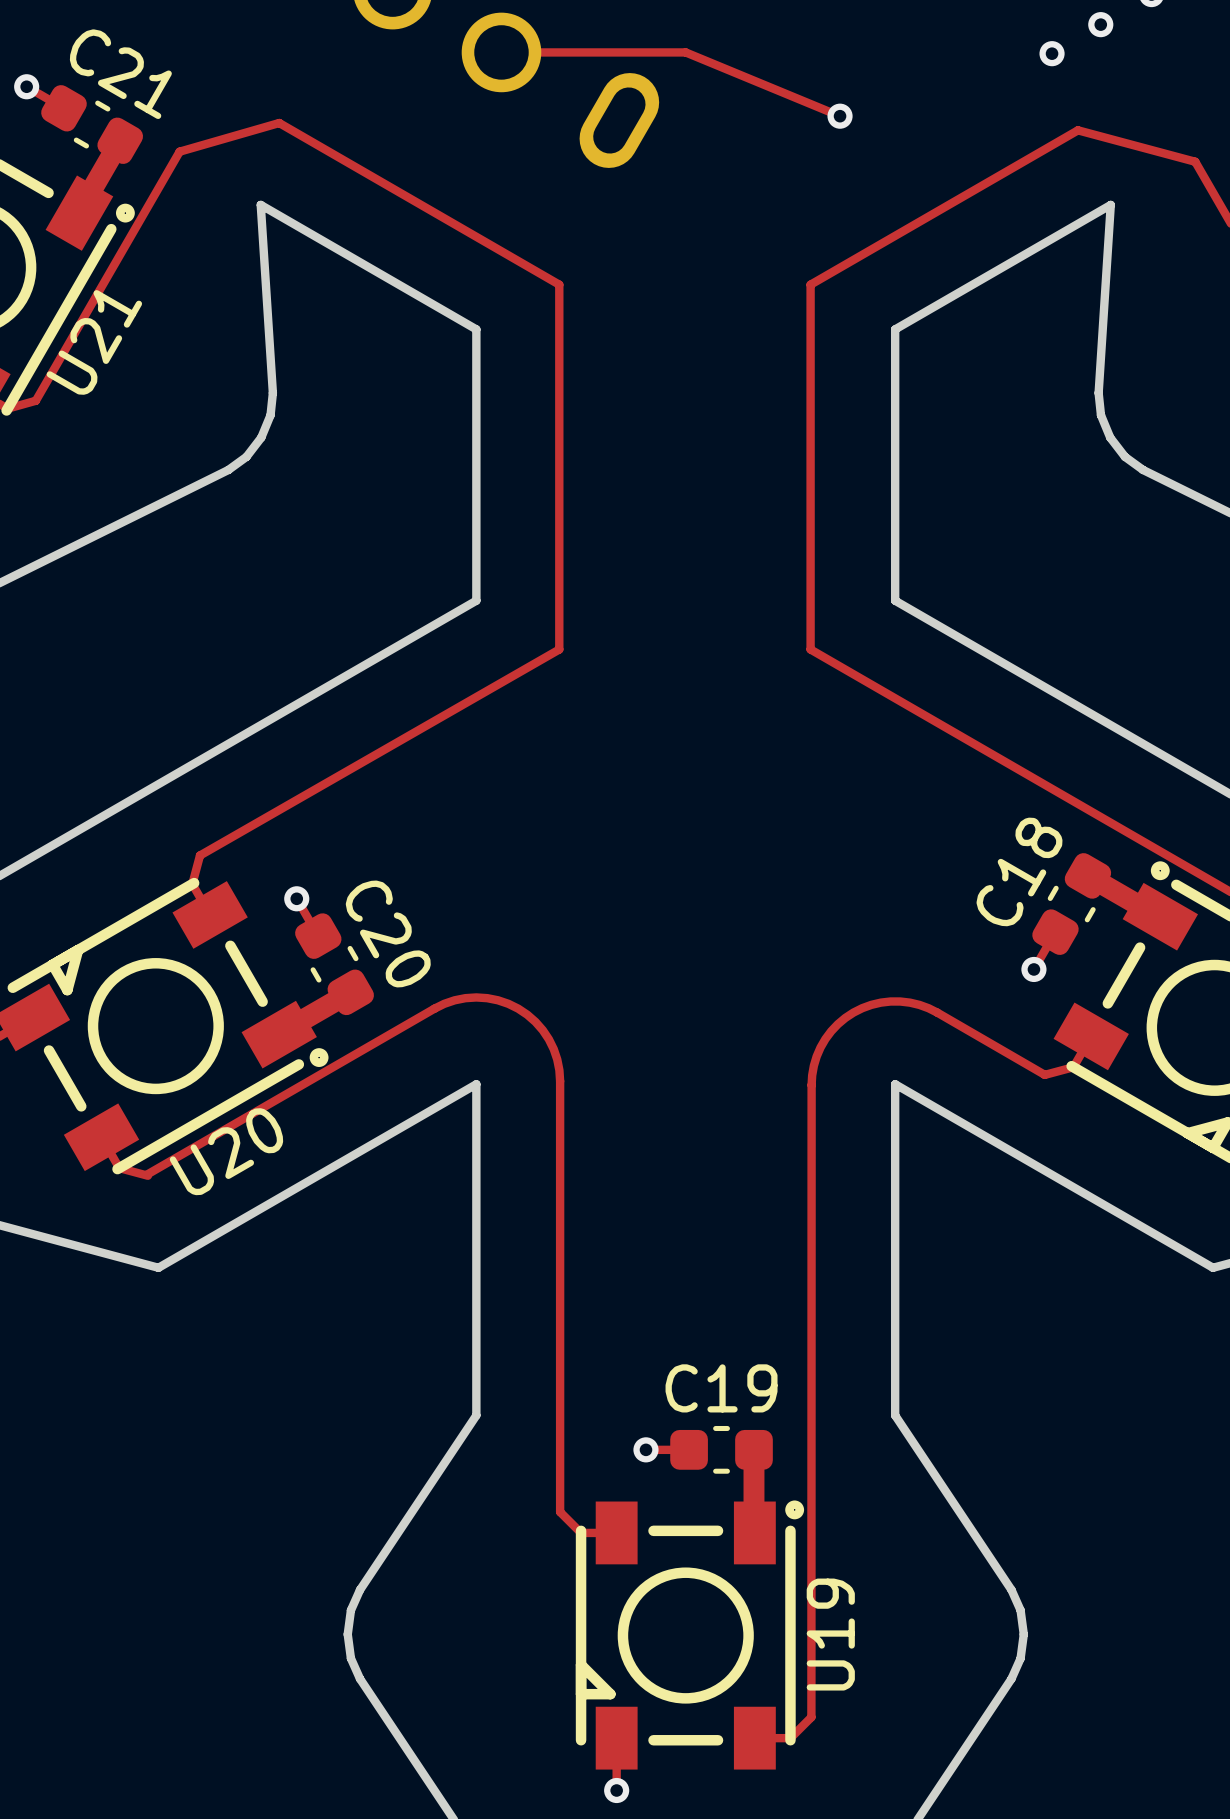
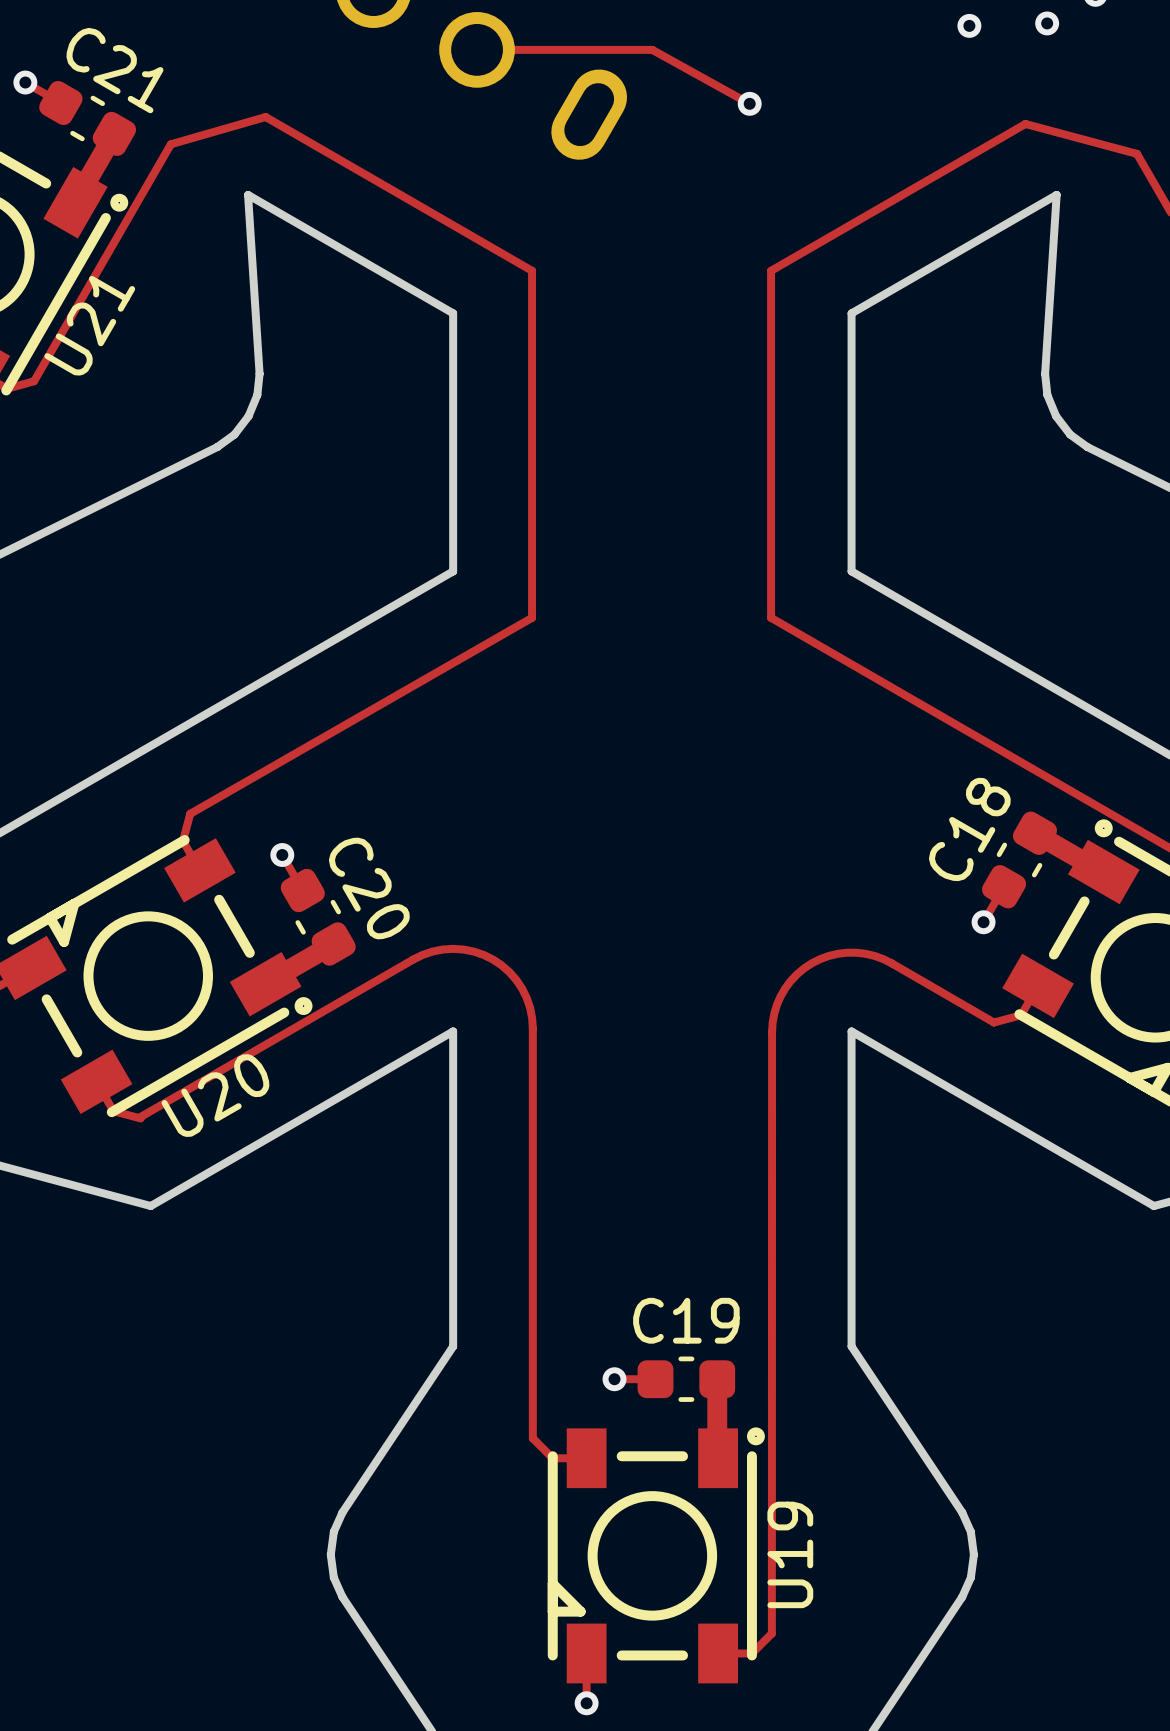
track: (685, 52) (840, 116) -> (652, 49) (749, 103)
via position: (1052, 53) -> (969, 25)
via position: (840, 116) -> (749, 103)

